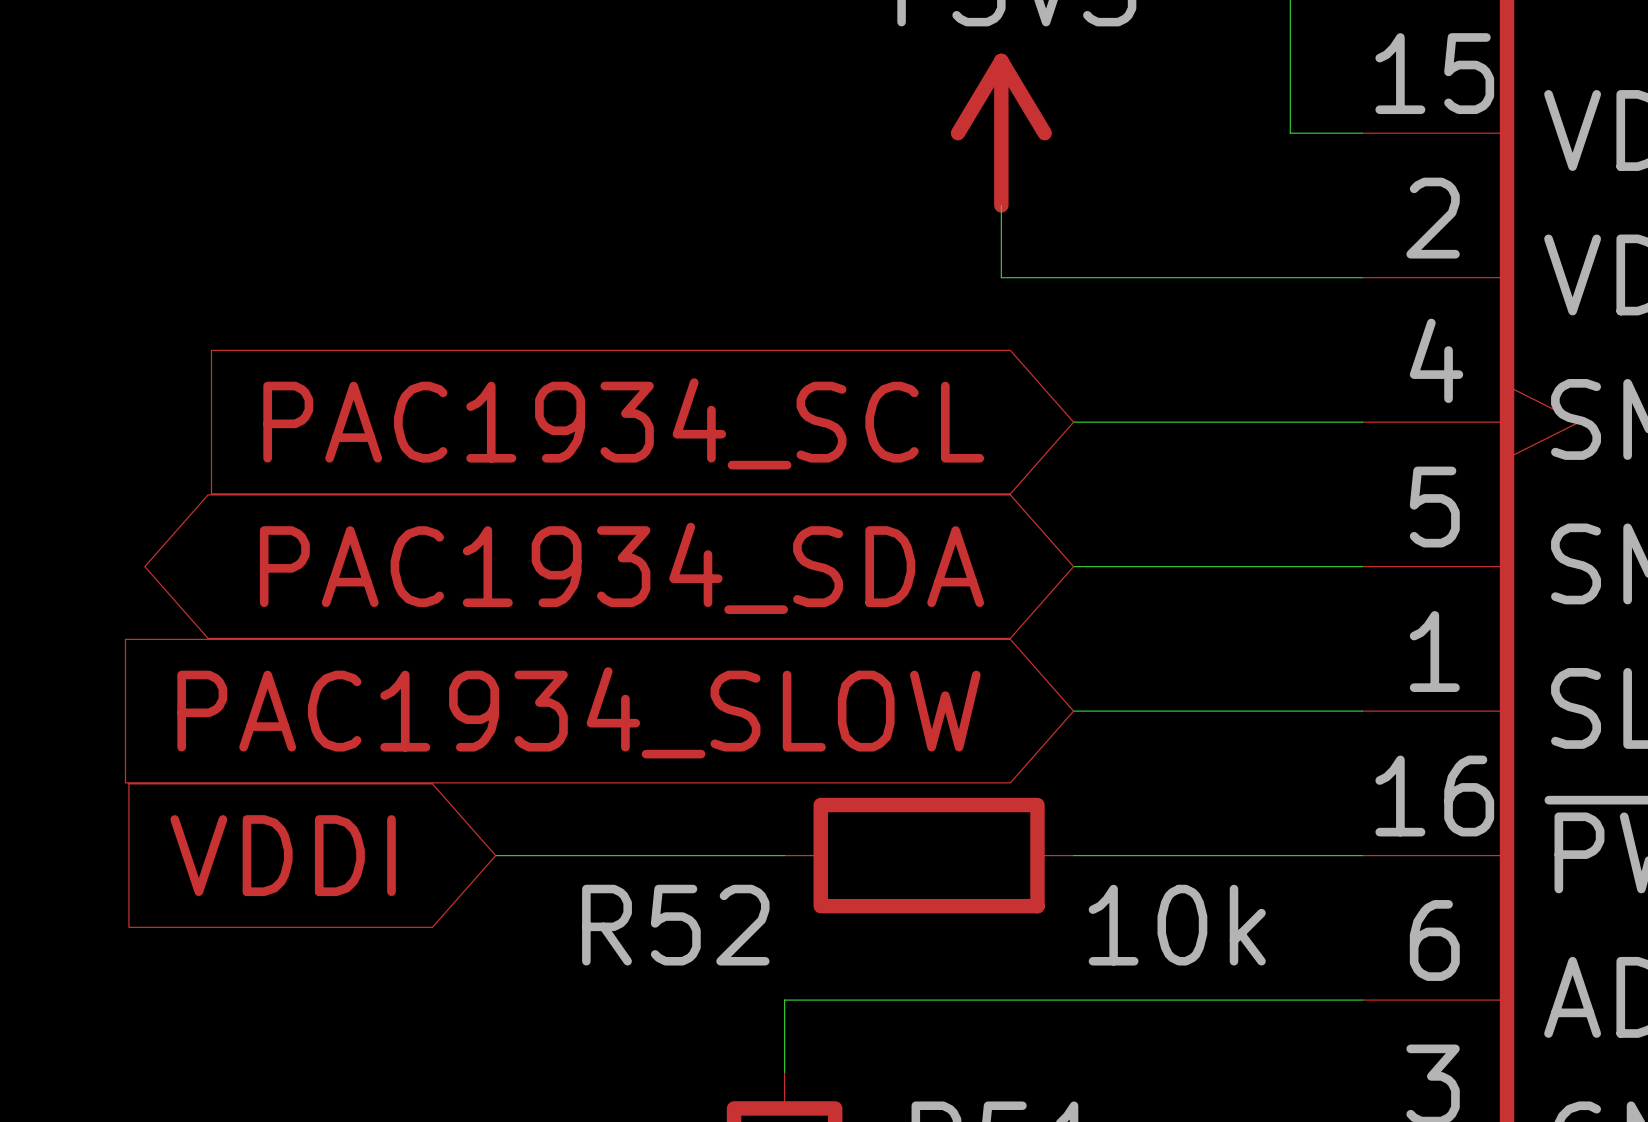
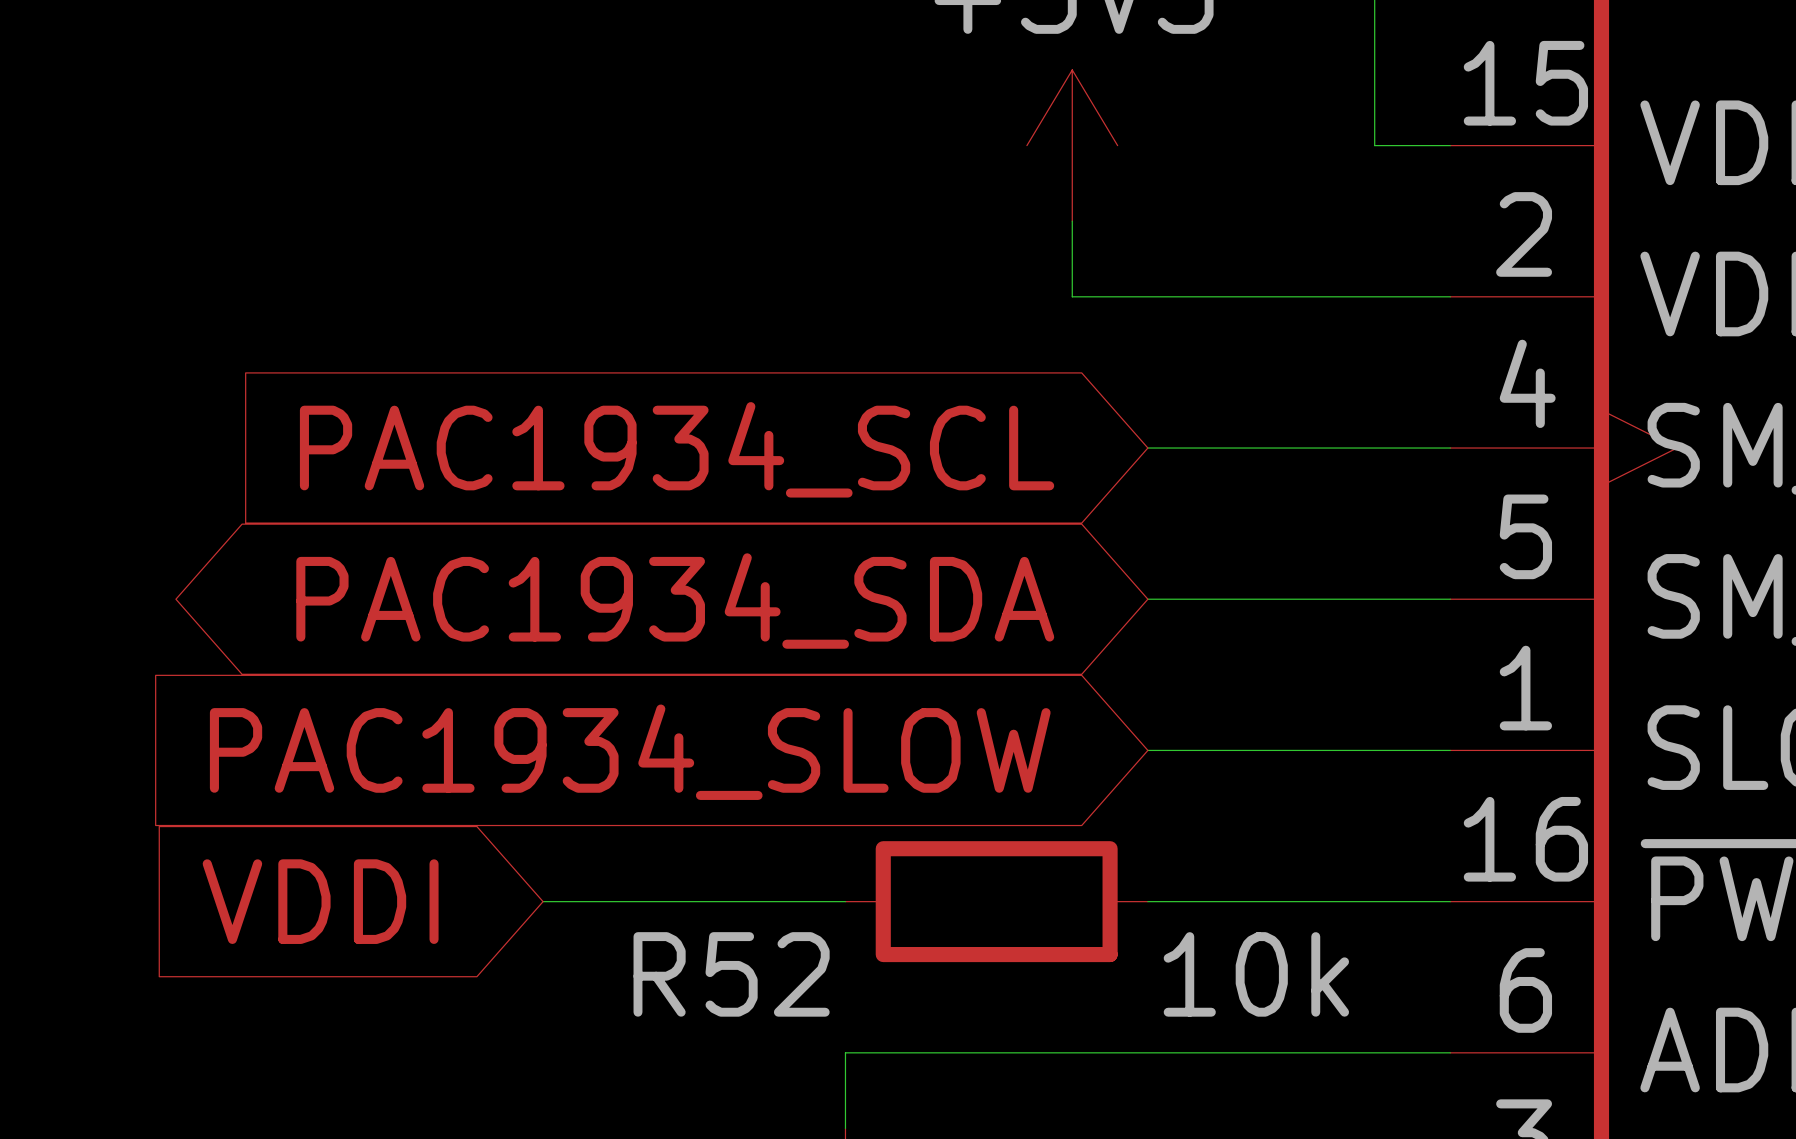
power symbol shape: [950, 53, 1052, 213] -> [1026, 70, 1118, 222]

